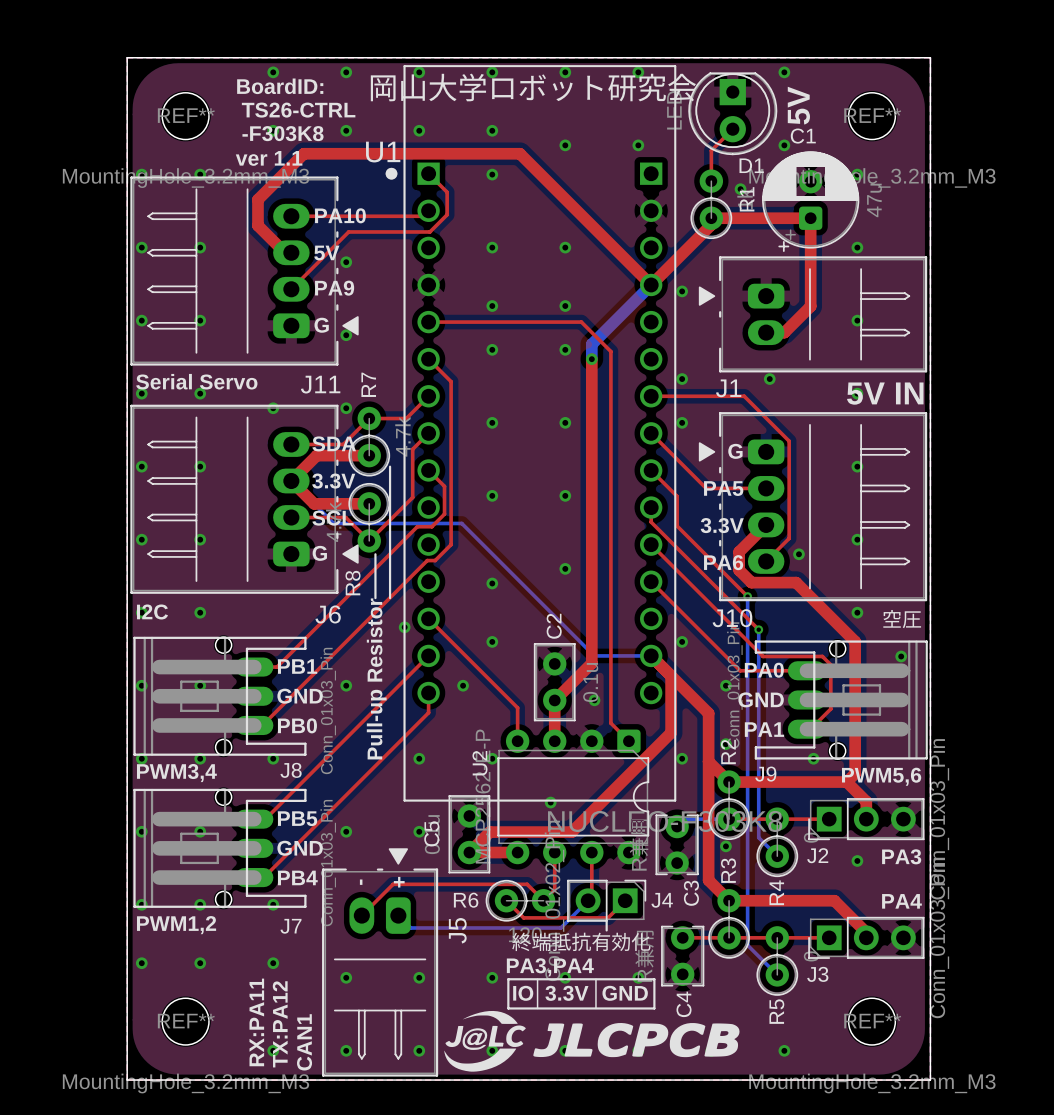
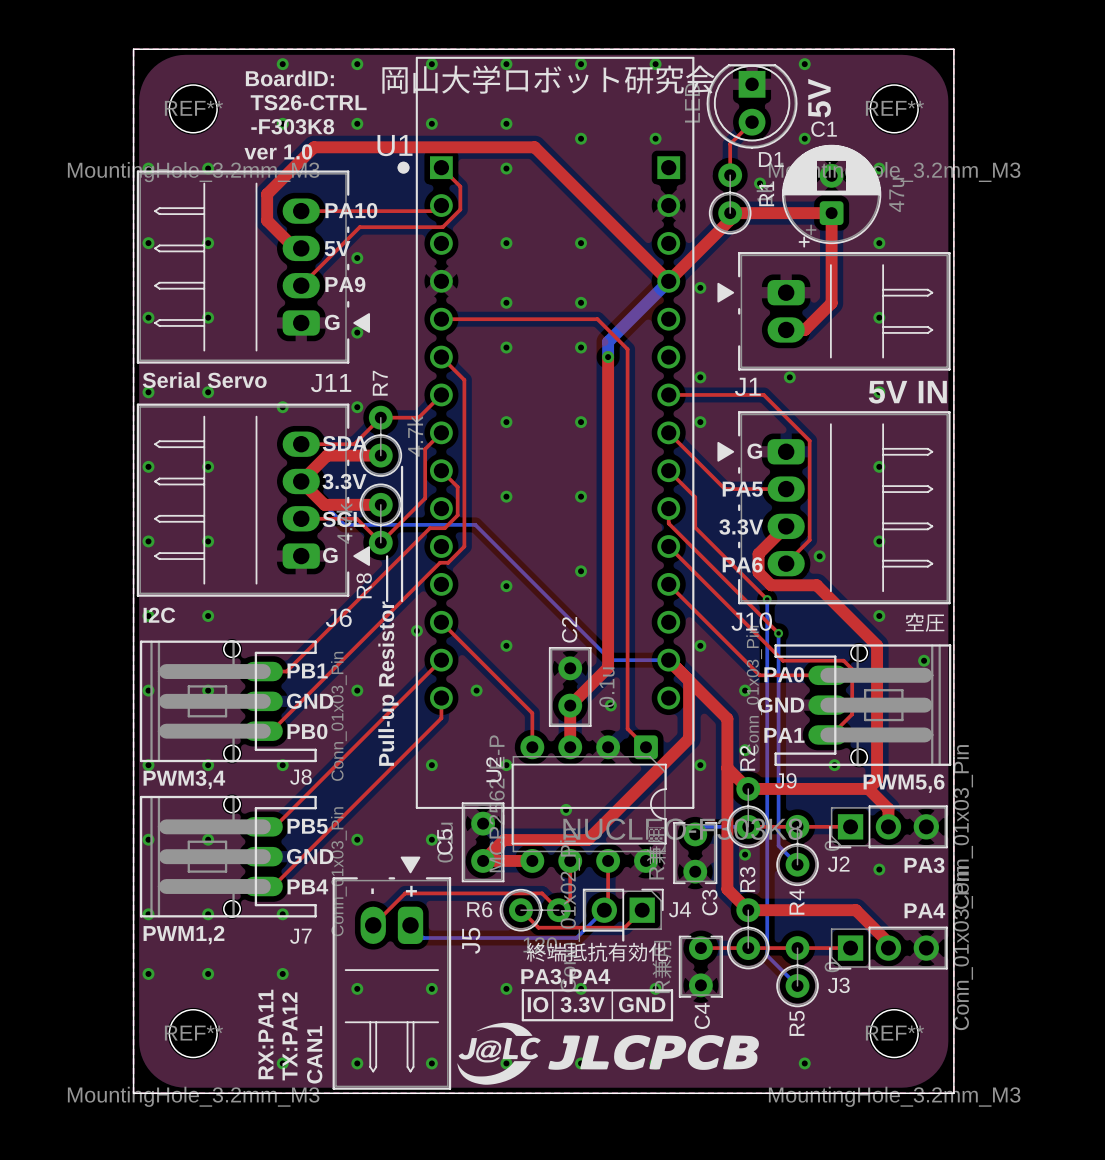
text: ver 1.1 (269, 158) -> ver 1.0 (278, 151)

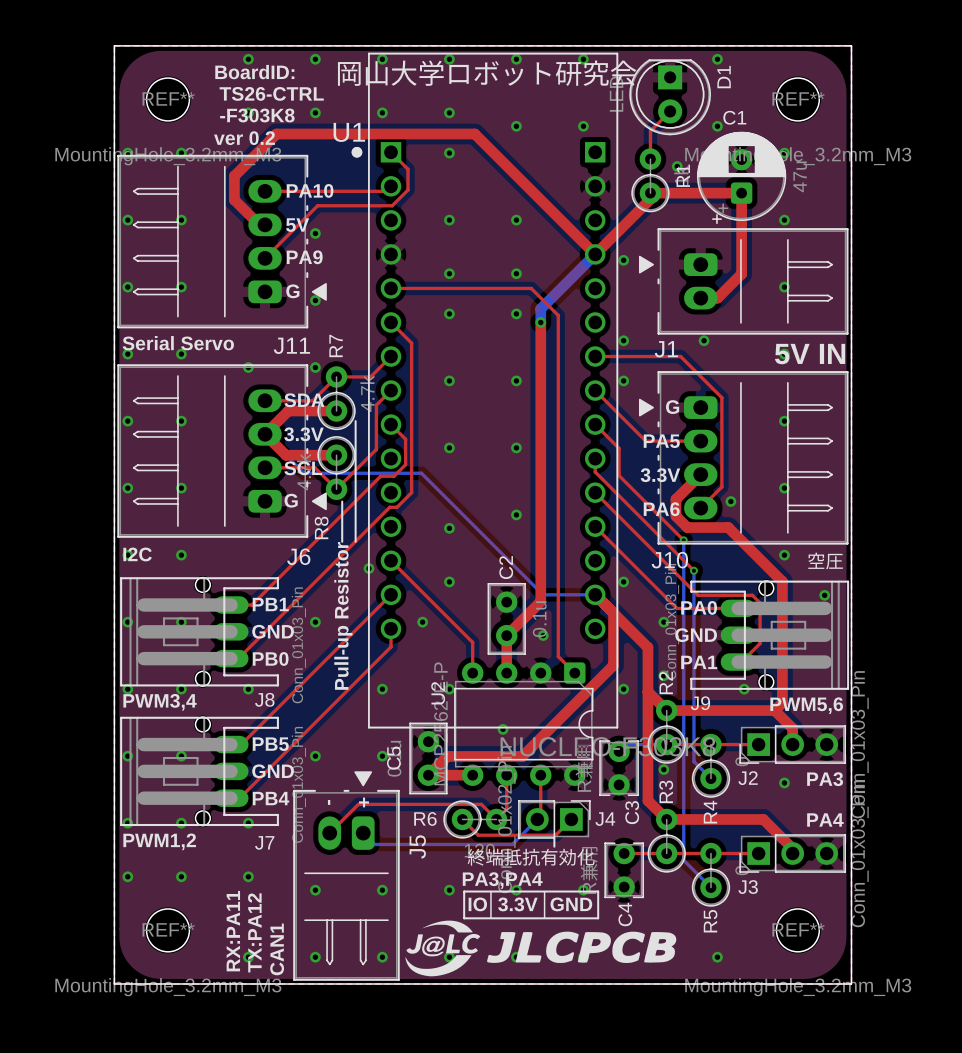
text: 5V (819, 98) -> none
text: ver 1.0 (278, 151) -> ver 0.2 (244, 138)
D1 name rotation: 0° (771, 159) -> 90° counterclockwise (724, 77)
D1 name position: D1 (771, 159) -> D1 (724, 77)

